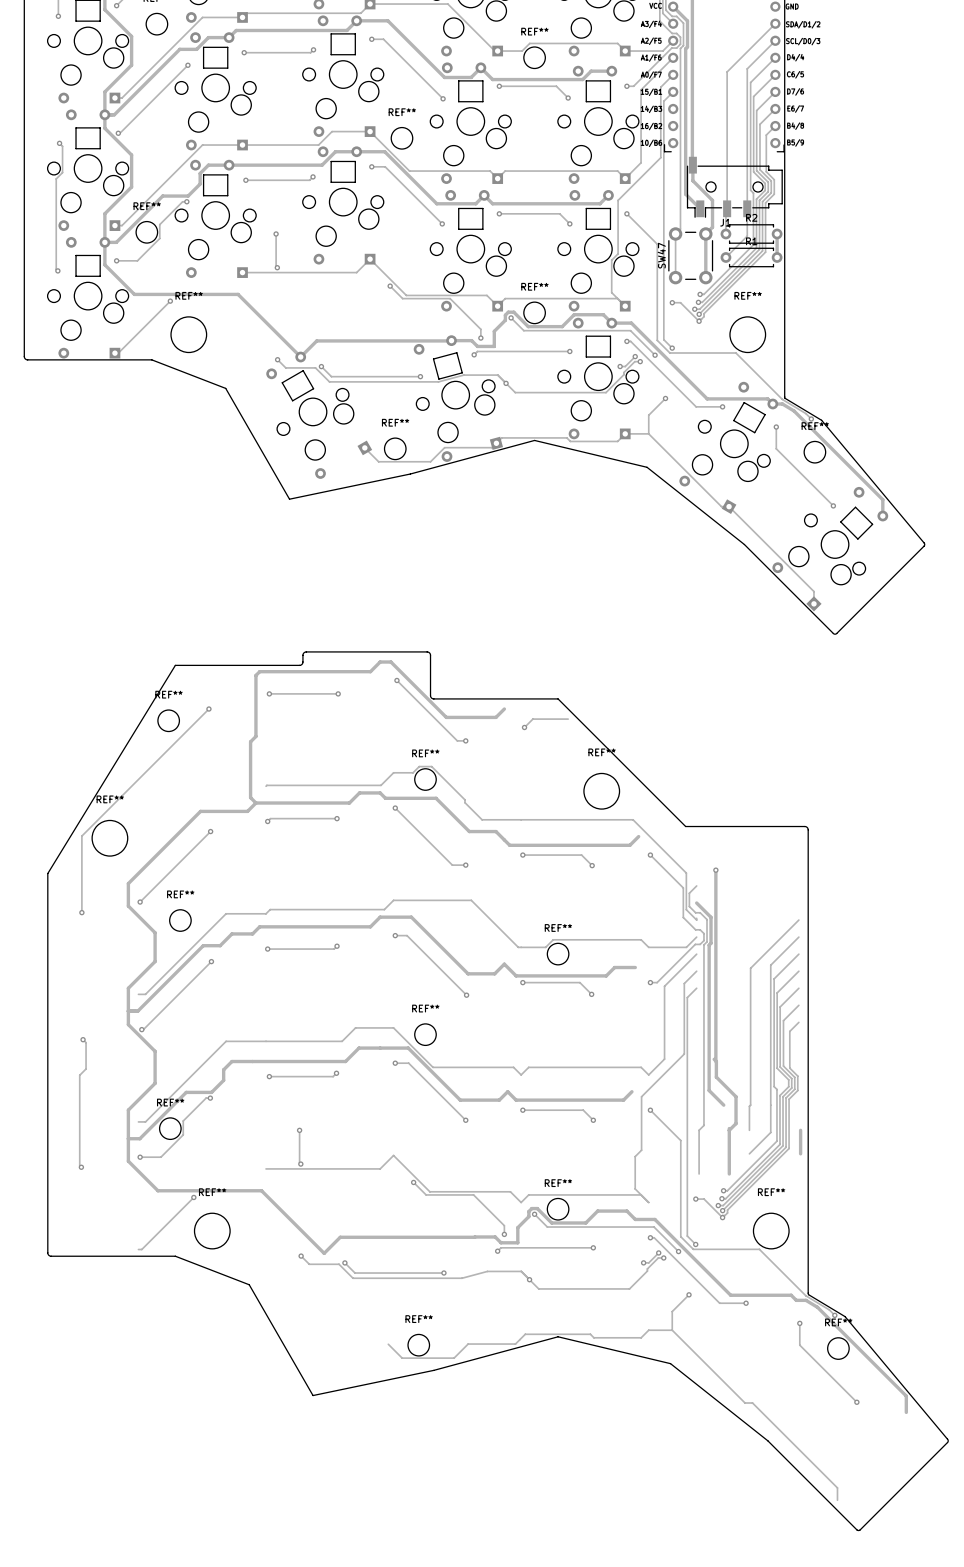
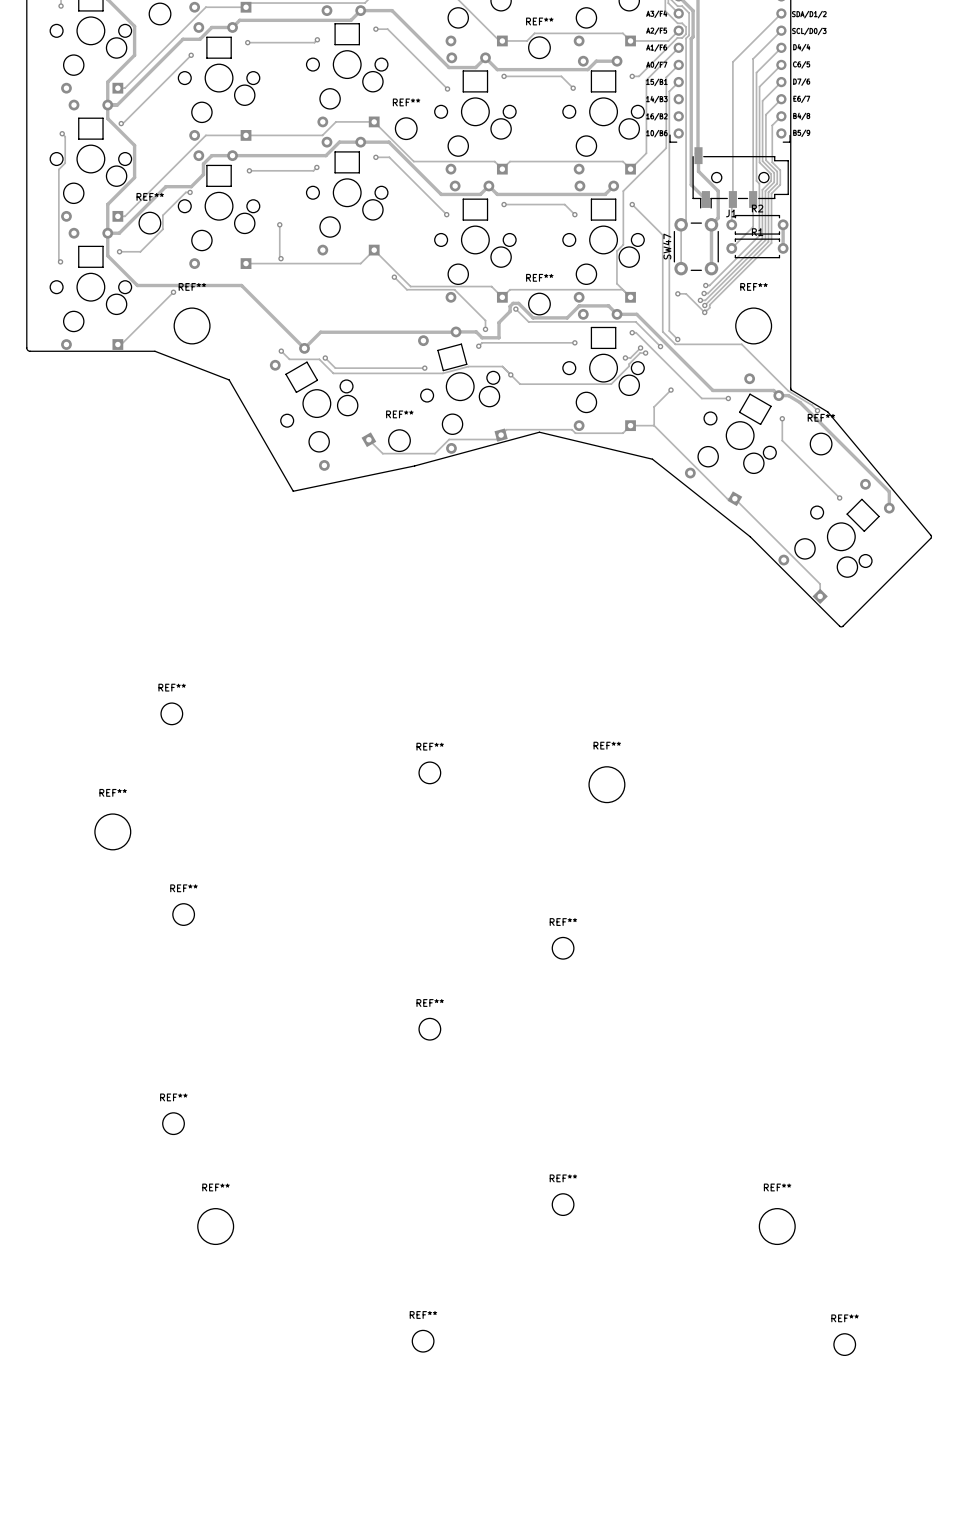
board edge: (306, 651) (428, 652) (430, 654) (431, 698) (558, 698) (685, 826) (804, 826) (807, 828) (808, 1293) (845, 1316) (948, 1440) (859, 1530) (856, 1529) (767, 1440) (670, 1363) (558, 1336) (433, 1370) (313, 1395) (249, 1284) (175, 1256) (51, 1256) (48, 1254) (47, 873) (175, 665) (300, 665) (302, 662) (303, 654) (306, 651) -> none
track: (396, 680) (457, 740) (465, 740) -> none
via: (396, 680) -> none
track: (269, 693) (338, 693) -> none
via: (269, 693) -> none
via: (338, 693) -> none
track: (208, 709) (81, 836) (81, 912) -> none
via: (208, 709) -> none
track: (504, 709) (495, 717) (446, 717) (390, 662) (380, 662) (370, 671) (259, 671) (255, 675) (255, 736) (250, 741) (250, 797) (255, 803) -> none
track: (568, 719) (532, 719) (524, 727) -> none
via: (524, 727) -> none
via: (465, 740) -> none
track: (266, 786) (381, 785) (393, 772) (413, 772) (419, 766) (431, 766) (482, 819) (633, 819) (686, 873) (686, 909) (696, 920) (696, 918) -> none
track: (255, 803) (349, 803) (359, 792) (380, 792) (385, 798) (436, 798) (469, 831) (495, 831) (509, 845) (629, 845) (638, 836) -> none
track: (255, 803) (247, 811) (200, 811) (128, 883) (128, 906) (155, 932) (155, 961) (128, 988) (128, 1024) (155, 1051) (155, 1083) (128, 1110) (128, 1161) (157, 1190) (261, 1190) (324, 1253) (340, 1237) (495, 1236) (501, 1242) (517, 1242) (517, 1227) (528, 1216) (528, 1211) (531, 1208) (537, 1208) (551, 1222) (585, 1222) (597, 1211) (626, 1211) (635, 1219) (654, 1219) (730, 1295) (791, 1295) (796, 1300) (805, 1300) (817, 1307) (906, 1396) (906, 1412) -> none
track: (395, 808) (452, 865) (465, 865) -> none
via: (395, 808) -> none
track: (337, 818) (270, 818) (267, 821) -> none
via: (337, 818) -> none
via: (267, 821) -> none
track: (210, 831) (140, 902) -> none
via: (210, 831) -> none
track: (522, 855) (581, 855) (592, 865) -> none
via: (522, 855) -> none
track: (650, 855) (683, 887) (683, 917) (695, 929) (700, 929) (703, 933) (703, 940) (700, 944) (695, 944) (657, 982) (650, 982) -> none
via: (650, 855) -> none
via: (465, 865) -> none
via: (592, 865) -> none
track: (715, 870) (715, 1061) -> none
via: (715, 870) -> none
track: (696, 885) (689, 893) (689, 906) (707, 919) (707, 941) (703, 944) (703, 1125) (699, 1130) (699, 1173) -> none
via: (140, 902) -> none
track: (696, 903) (711, 917) (711, 943) (709, 945) (709, 1090) (723, 1105) -> none
via: (81, 912) -> none
track: (798, 920) (750, 968) (749, 1130) -> none
track: (395, 935) (407, 935) (466, 995) -> none
via: (395, 935) -> none
track: (696, 937) (686, 947) (648, 947) (641, 939) (553, 939) (545, 947) (518, 947) (471, 900) (393, 900) (384, 909) (270, 909) (266, 913) (226, 913) (145, 994) (138, 994) -> none
track: (798, 937) (770, 965) (770, 1132) (749, 1153) -> none
track: (337, 946) (334, 949) (267, 949) -> none
via: (337, 946) -> none
via: (267, 949) -> none
track: (696, 954) (664, 986) (664, 1059) (648, 1074) (641, 1067) (528, 1067) (521, 1074) (513, 1067) (433, 1067) (393, 1027) (355, 1027) (342, 1041) (226, 1041) (145, 1121) (138, 1121) -> none
track: (798, 954) (774, 978) (774, 1086) (776, 1089) (776, 1141) (727, 1190) (723, 1190) -> none
track: (211, 961) (141, 1029) -> none
via: (211, 961) -> none
track: (635, 967) (614, 967) (606, 975) (516, 975) (504, 964) (494, 973) (468, 973) (411, 917) (380, 917) (370, 926) (259, 926) (252, 933) (231, 933) (220, 945) (203, 945) (137, 1011) (128, 1011) -> none
track: (696, 971) (684, 983) (684, 1054) (641, 1096) (641, 1150) (635, 1156) (635, 1188) (648, 1202) -> none
track: (798, 971) (777, 992) (777, 1068) (788, 1079) (788, 1086) (780, 1095) (780, 1144) (725, 1198) (721, 1198) -> none
track: (522, 982) (579, 982) (591, 994) -> none
via: (522, 982) -> none
via: (650, 982) -> none
track: (696, 988) (687, 997) (687, 1236) (695, 1244) -> none
track: (798, 988) (780, 1006) (780, 1067) (791, 1078) (791, 1088) (783, 1096) (783, 1145) (723, 1205) (718, 1205) -> none
via: (591, 994) -> none
via: (466, 995) -> none
track: (798, 1005) (783, 1020) (783, 1066) (794, 1077) (794, 1089) (786, 1098) (786, 1147) (722, 1210) -> none
track: (798, 1022) (789, 1031) (789, 1068) (797, 1076) (797, 1090) (789, 1099) (789, 1148) (727, 1210) (727, 1212) (722, 1215) (722, 1217) (704, 1199) (695, 1199) -> none
via: (141, 1029) -> none
track: (83, 1039) (86, 1042) (86, 1068) (79, 1075) (79, 1165) (81, 1167) -> none
via: (83, 1039) -> none
track: (714, 1059) (716, 1061) (716, 1077) (736, 1096) (736, 1123) (729, 1130) -> none
track: (395, 1063) (408, 1063) (465, 1120) -> none
via: (395, 1063) -> none
track: (336, 1073) (333, 1076) (269, 1076) -> none
via: (336, 1073) -> none
via: (269, 1076) -> none
track: (631, 1091) (623, 1100) (516, 1100) (507, 1091) (499, 1100) (460, 1100) (408, 1048) (359, 1048) (345, 1061) (231, 1061) (223, 1069) (223, 1080) (211, 1092) (186, 1092) (139, 1138) (128, 1138) -> none
track: (210, 1098) (206, 1098) (183, 1120) (183, 1134) (160, 1157) (140, 1157) -> none
via: (210, 1098) -> none
track: (522, 1110) (583, 1110) (593, 1120) -> none
via: (522, 1110) -> none
track: (650, 1110) (680, 1140) (680, 1236) (693, 1249) (759, 1249) (805, 1295) (834, 1315) -> none
via: (650, 1110) -> none
via: (465, 1120) -> none
via: (593, 1120) -> none
track: (729, 1128) (729, 1173) -> none
track: (299, 1130) (300, 1164) -> none
via: (299, 1130) -> none
track: (800, 1130) (800, 1153) -> none
via: (140, 1157) -> none
via: (300, 1164) -> none
via: (81, 1167) -> none
track: (266, 1168) (380, 1168) (393, 1155) (429, 1191) (510, 1191) (521, 1202) (528, 1194) (641, 1194) -> none
track: (413, 1182) (426, 1194) (473, 1194) (504, 1225) (504, 1234) -> none
via: (413, 1182) -> none
via: (723, 1190) -> none
track: (193, 1197) (141, 1249) (138, 1249) -> none
via: (193, 1197) -> none
via: (721, 1198) -> none
via: (695, 1199) -> none
via: (718, 1205) -> none
via: (722, 1210) -> none
track: (534, 1214) (547, 1227) (654, 1227) (678, 1251) -> none
via: (534, 1214) -> none
via: (722, 1217) -> none
via: (504, 1234) -> none
track: (650, 1237) (654, 1237) (719, 1303) (746, 1303) -> none
via: (650, 1237) -> none
via: (695, 1244) -> none
track: (593, 1247) (501, 1247) (497, 1251) -> none
via: (593, 1247) -> none
via: (497, 1251) -> none
via: (678, 1251) -> none
track: (658, 1252) (648, 1262) (643, 1262) -> none
via: (658, 1252) -> none
track: (301, 1256) (309, 1264) (339, 1264) (353, 1278) (462, 1278) (487, 1271) (521, 1271) (538, 1288) (629, 1288) (658, 1257) (663, 1257) -> none
via: (301, 1256) -> none
via: (663, 1257) -> none
track: (344, 1262) (354, 1273) (443, 1273) -> none
via: (344, 1262) -> none
via: (643, 1262) -> none
via: (443, 1273) -> none
via: (529, 1279) -> none
track: (689, 1294) (672, 1311) (672, 1330) -> none
via: (689, 1294) -> none
via: (746, 1303) -> none
via: (834, 1315) -> none
track: (799, 1323) (799, 1345) (856, 1402) -> none
via: (799, 1323) -> none
track: (672, 1330) (745, 1403) (752, 1403) (837, 1487) (837, 1500) -> none
track: (672, 1330) (648, 1330) (641, 1337) (593, 1337) (590, 1334) (525, 1334) (515, 1344) (468, 1344) (454, 1358) (402, 1358) (388, 1344) -> none
via: (856, 1402) -> none

